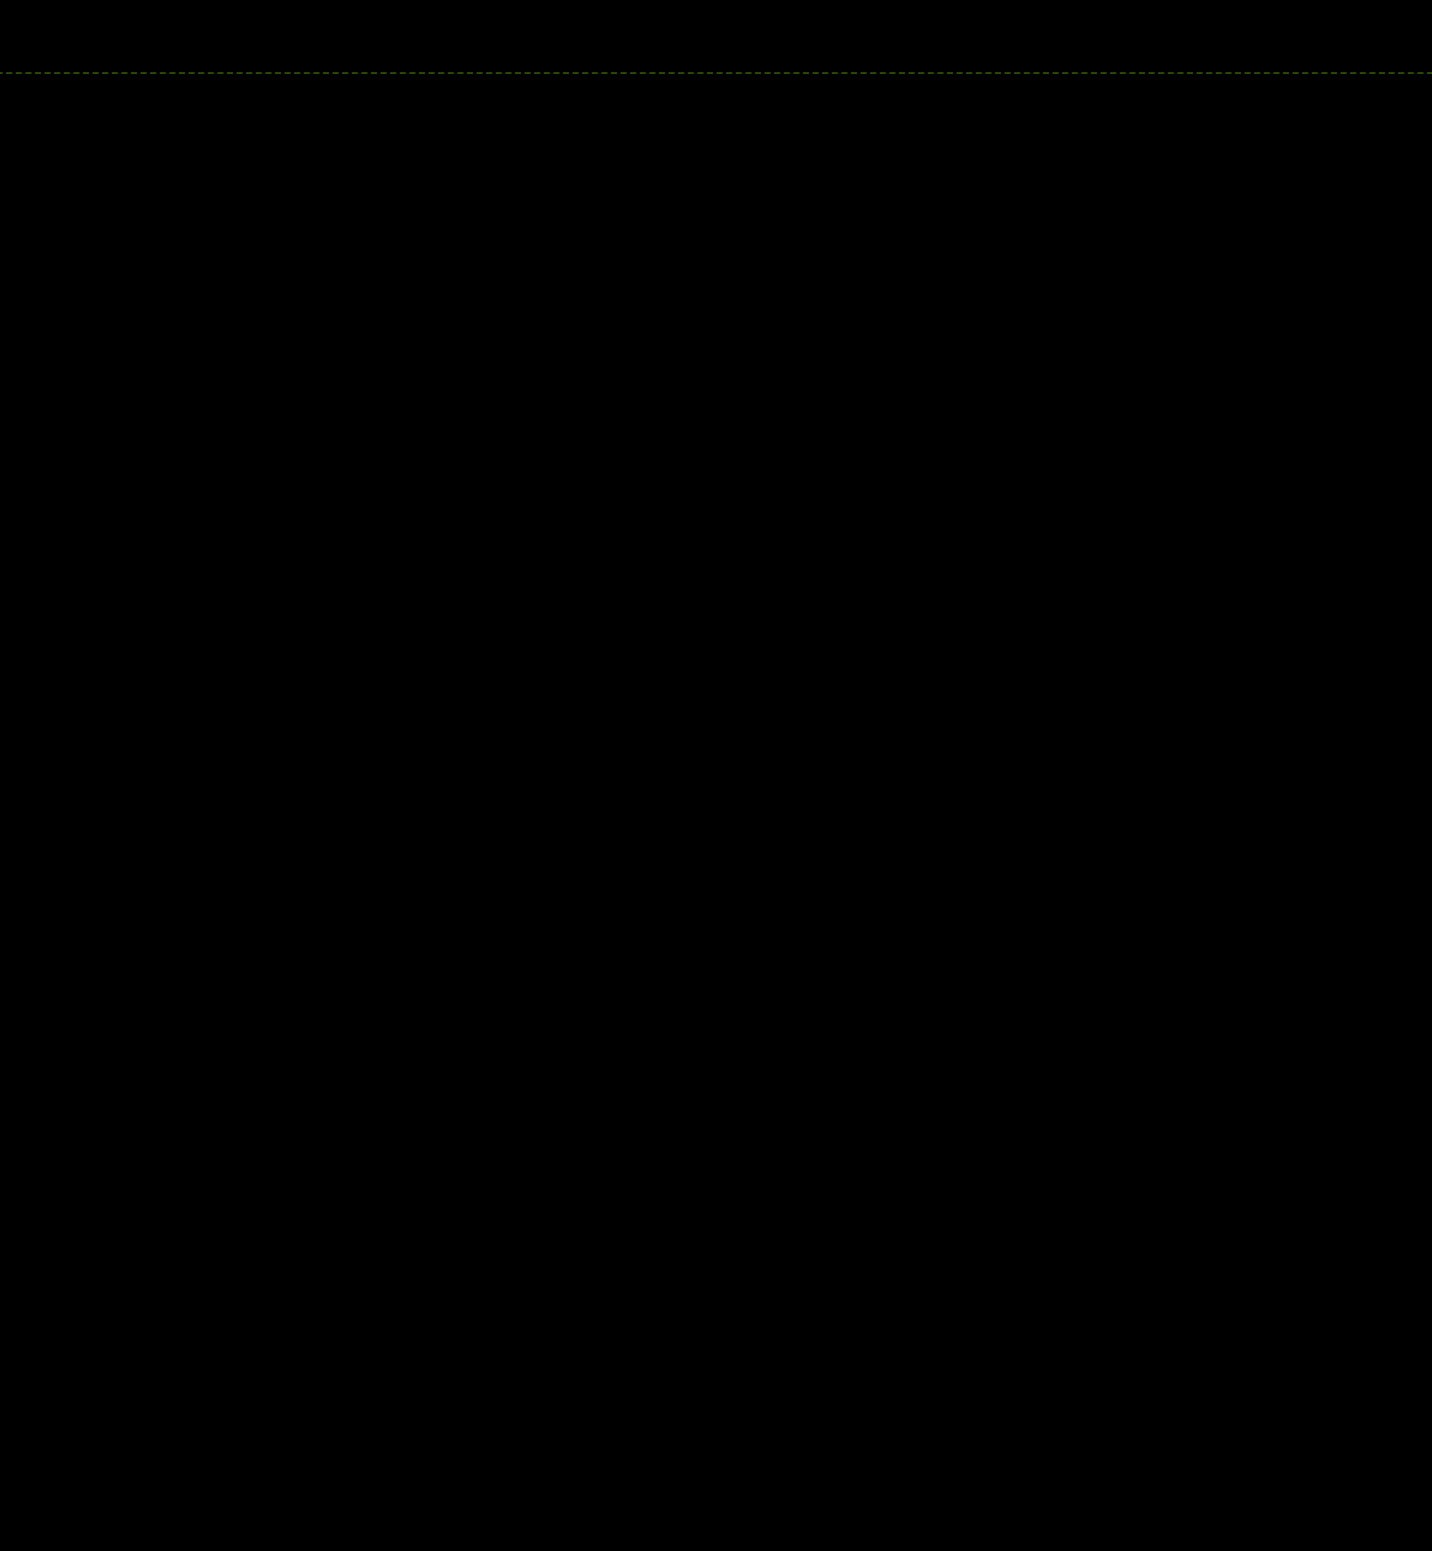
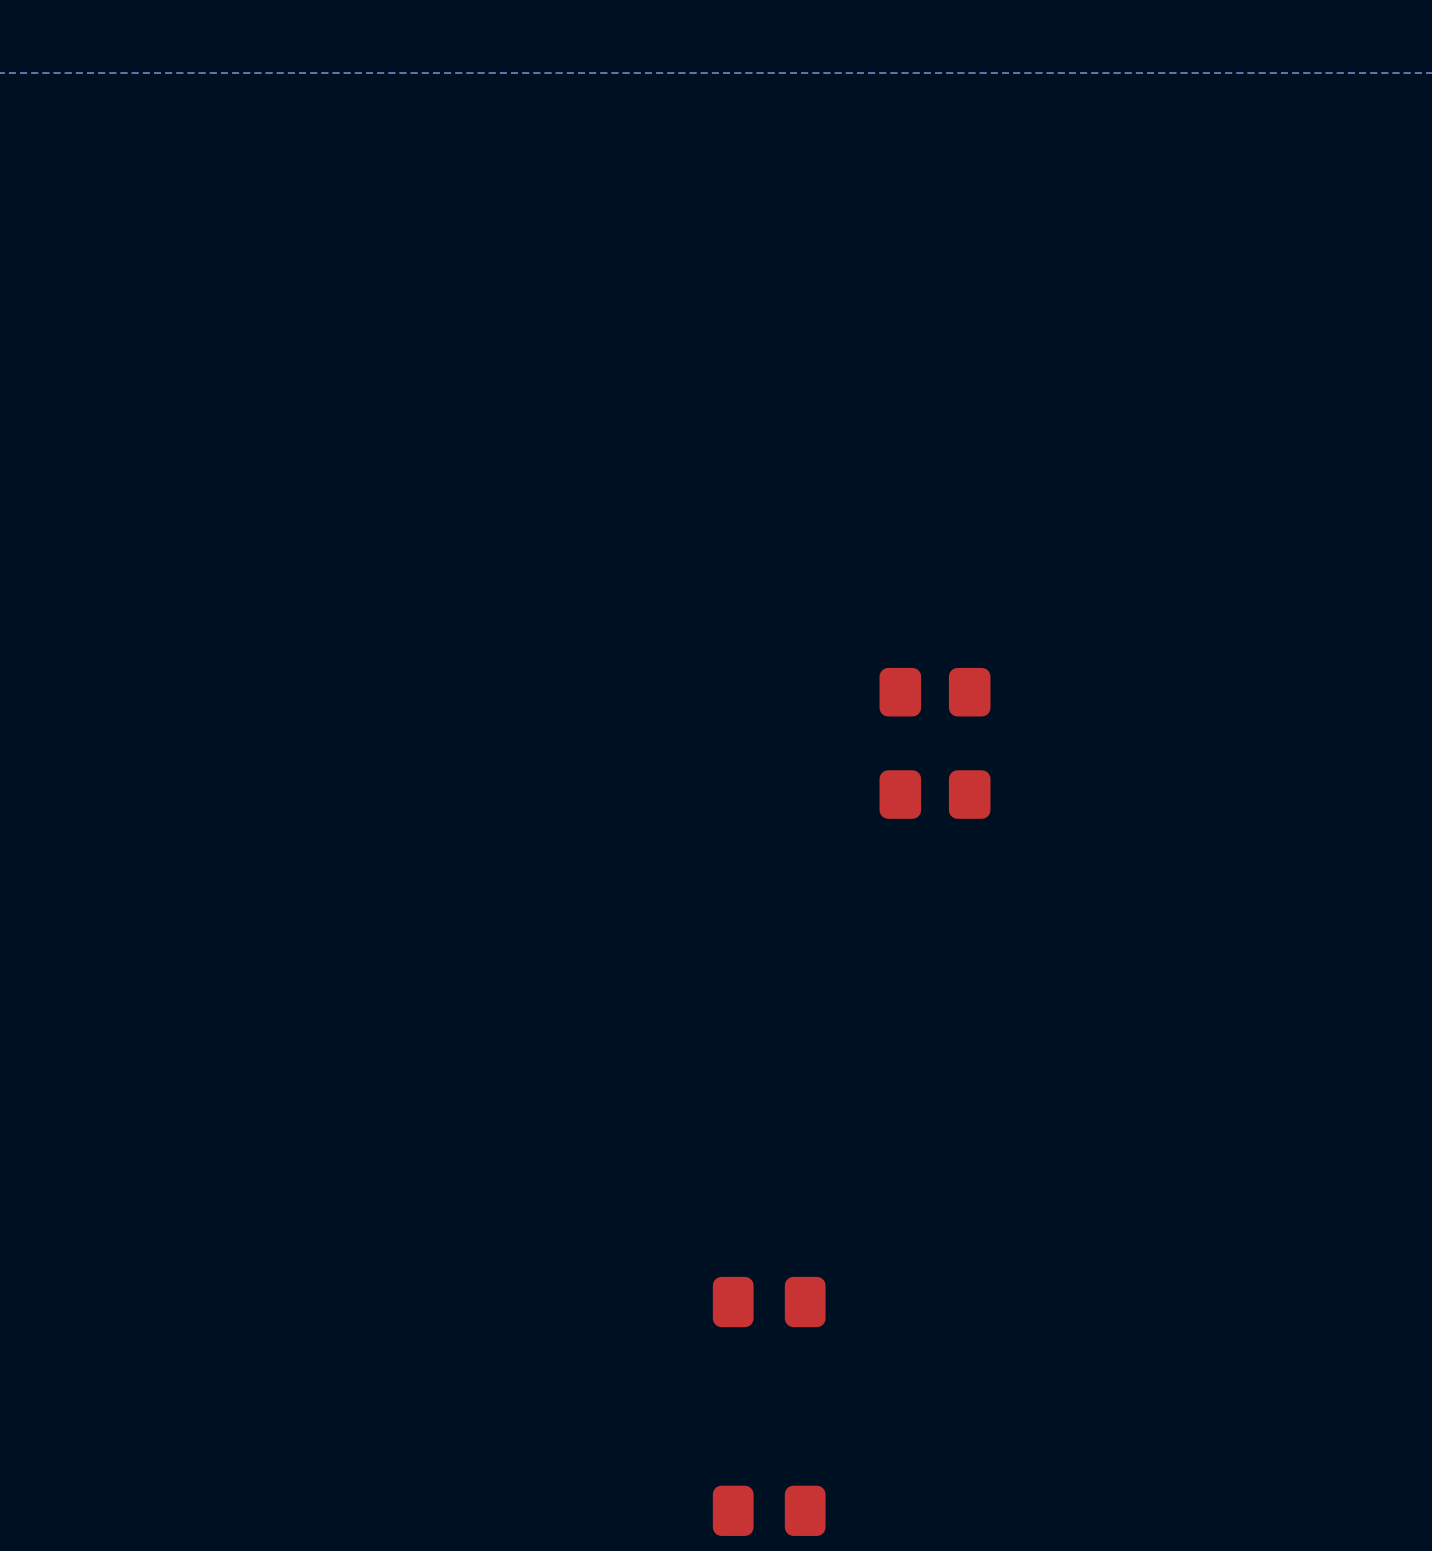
part: none -> (935, 692)
part: none -> (935, 794)
part: none -> (769, 1302)
part: none -> (769, 1510)

